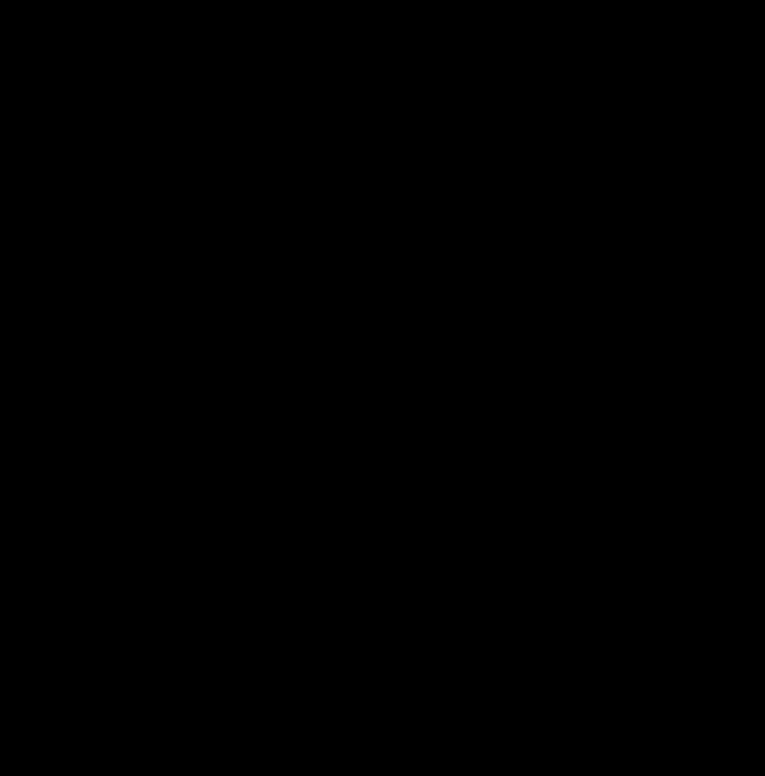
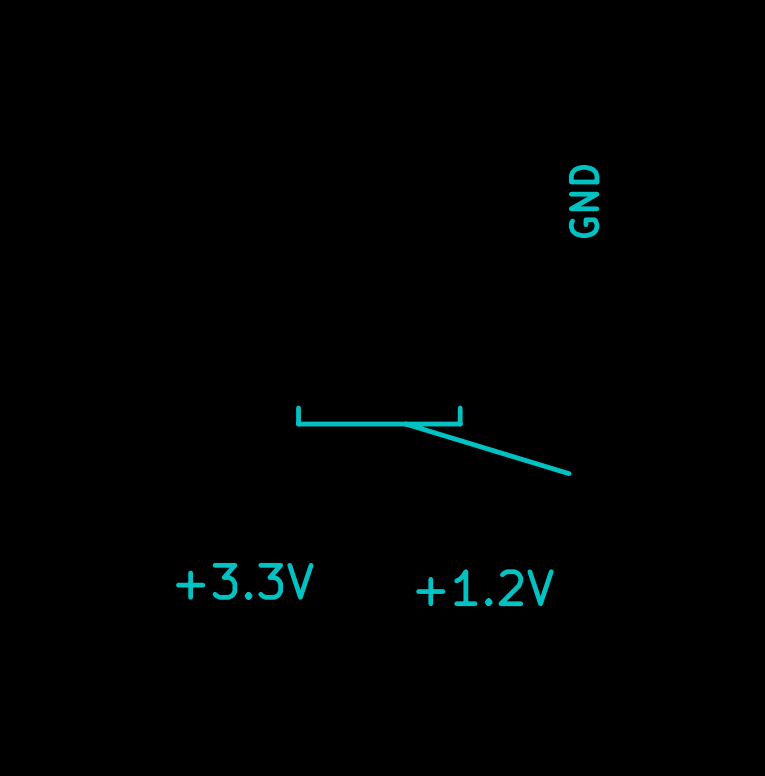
text: none -> GND (584, 201)
line: none -> (298, 408) (298, 424) (460, 424) (460, 408)
line: none -> (405, 424) (569, 473)
text: none -> +3.3V (244, 581)
text: none -> +1.2V (484, 587)

